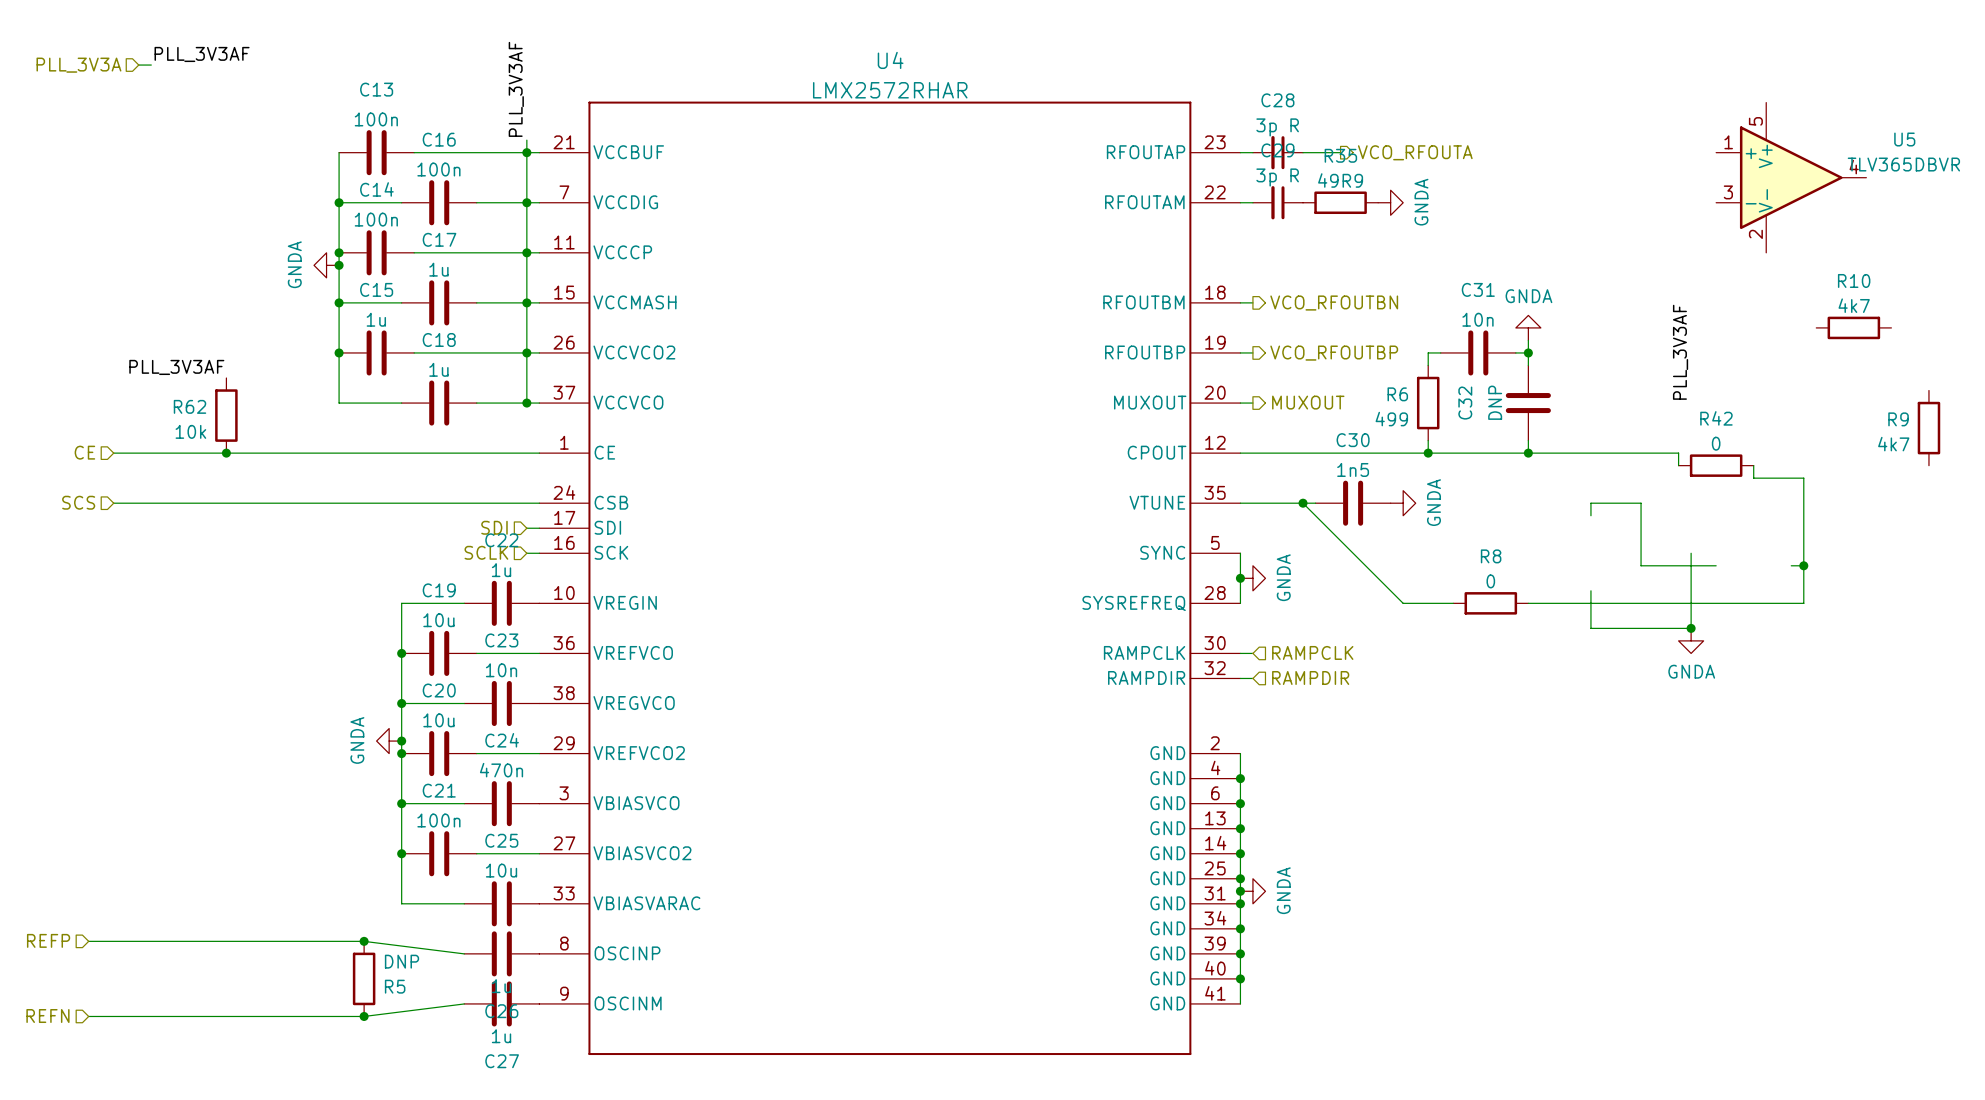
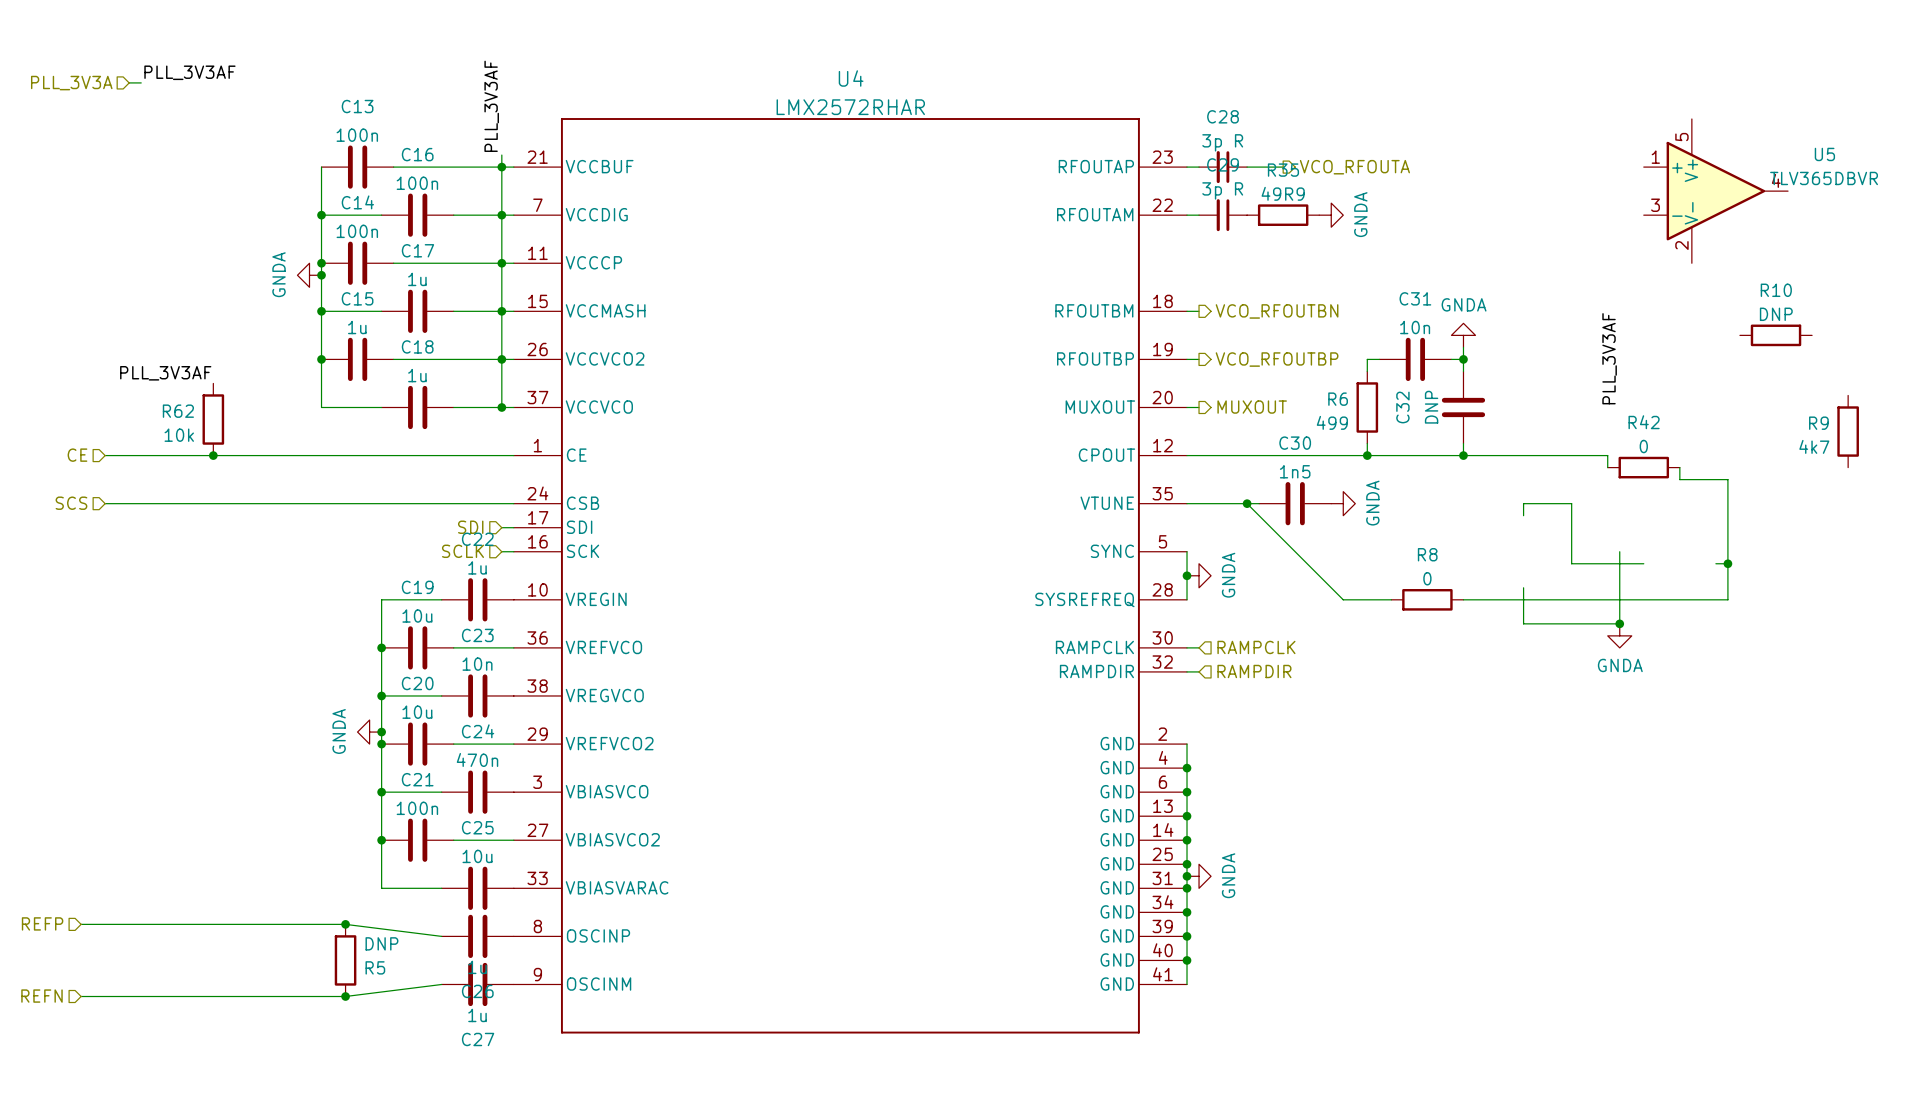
R10 value: 4k7 (1854, 305) -> DNP (1776, 314)

